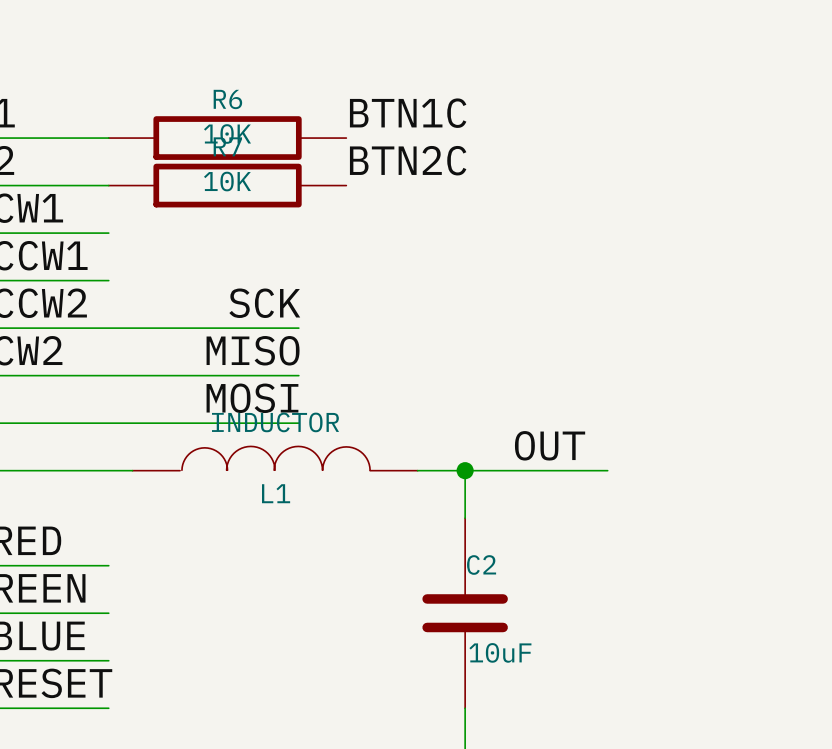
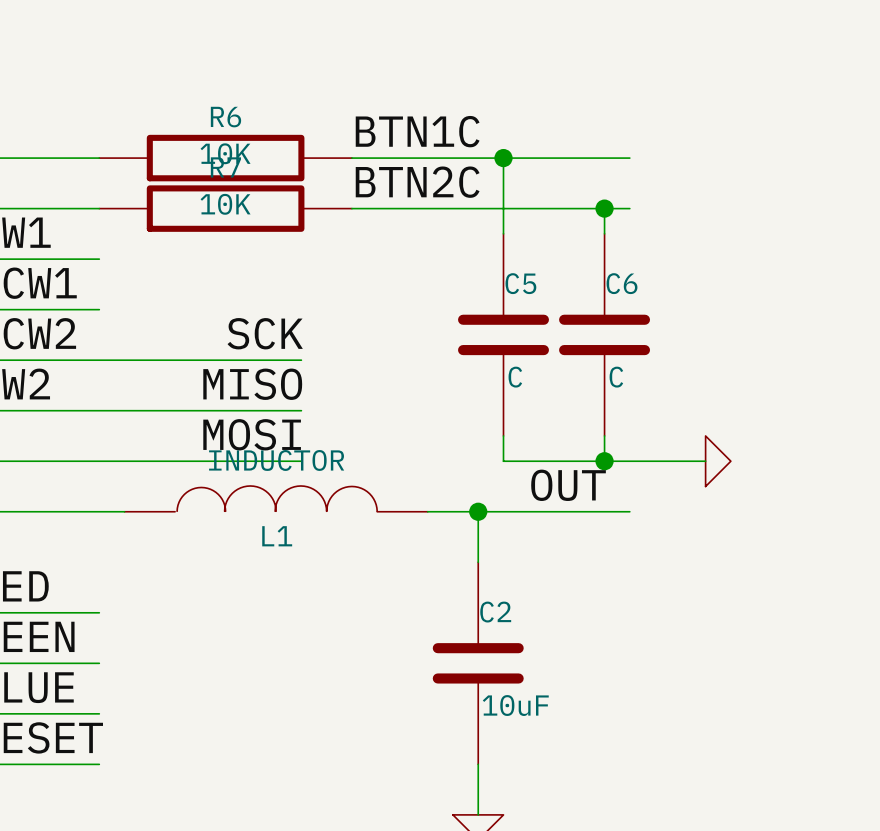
wire: none -> (351, 158) (629, 158)
wire: none -> (503, 158) (503, 233)
junction: none -> (503, 158)
wire: none -> (351, 208) (629, 208)
wire: none -> (604, 208) (604, 233)
junction: none -> (604, 208)
C5: none -> C (503, 334)
C6: none -> C (604, 334)
wire: none -> (503, 435) (503, 461) (705, 461)
wire: none -> (604, 435) (604, 461)
junction: none -> (604, 461)
power symbol: none -> (718, 461)

